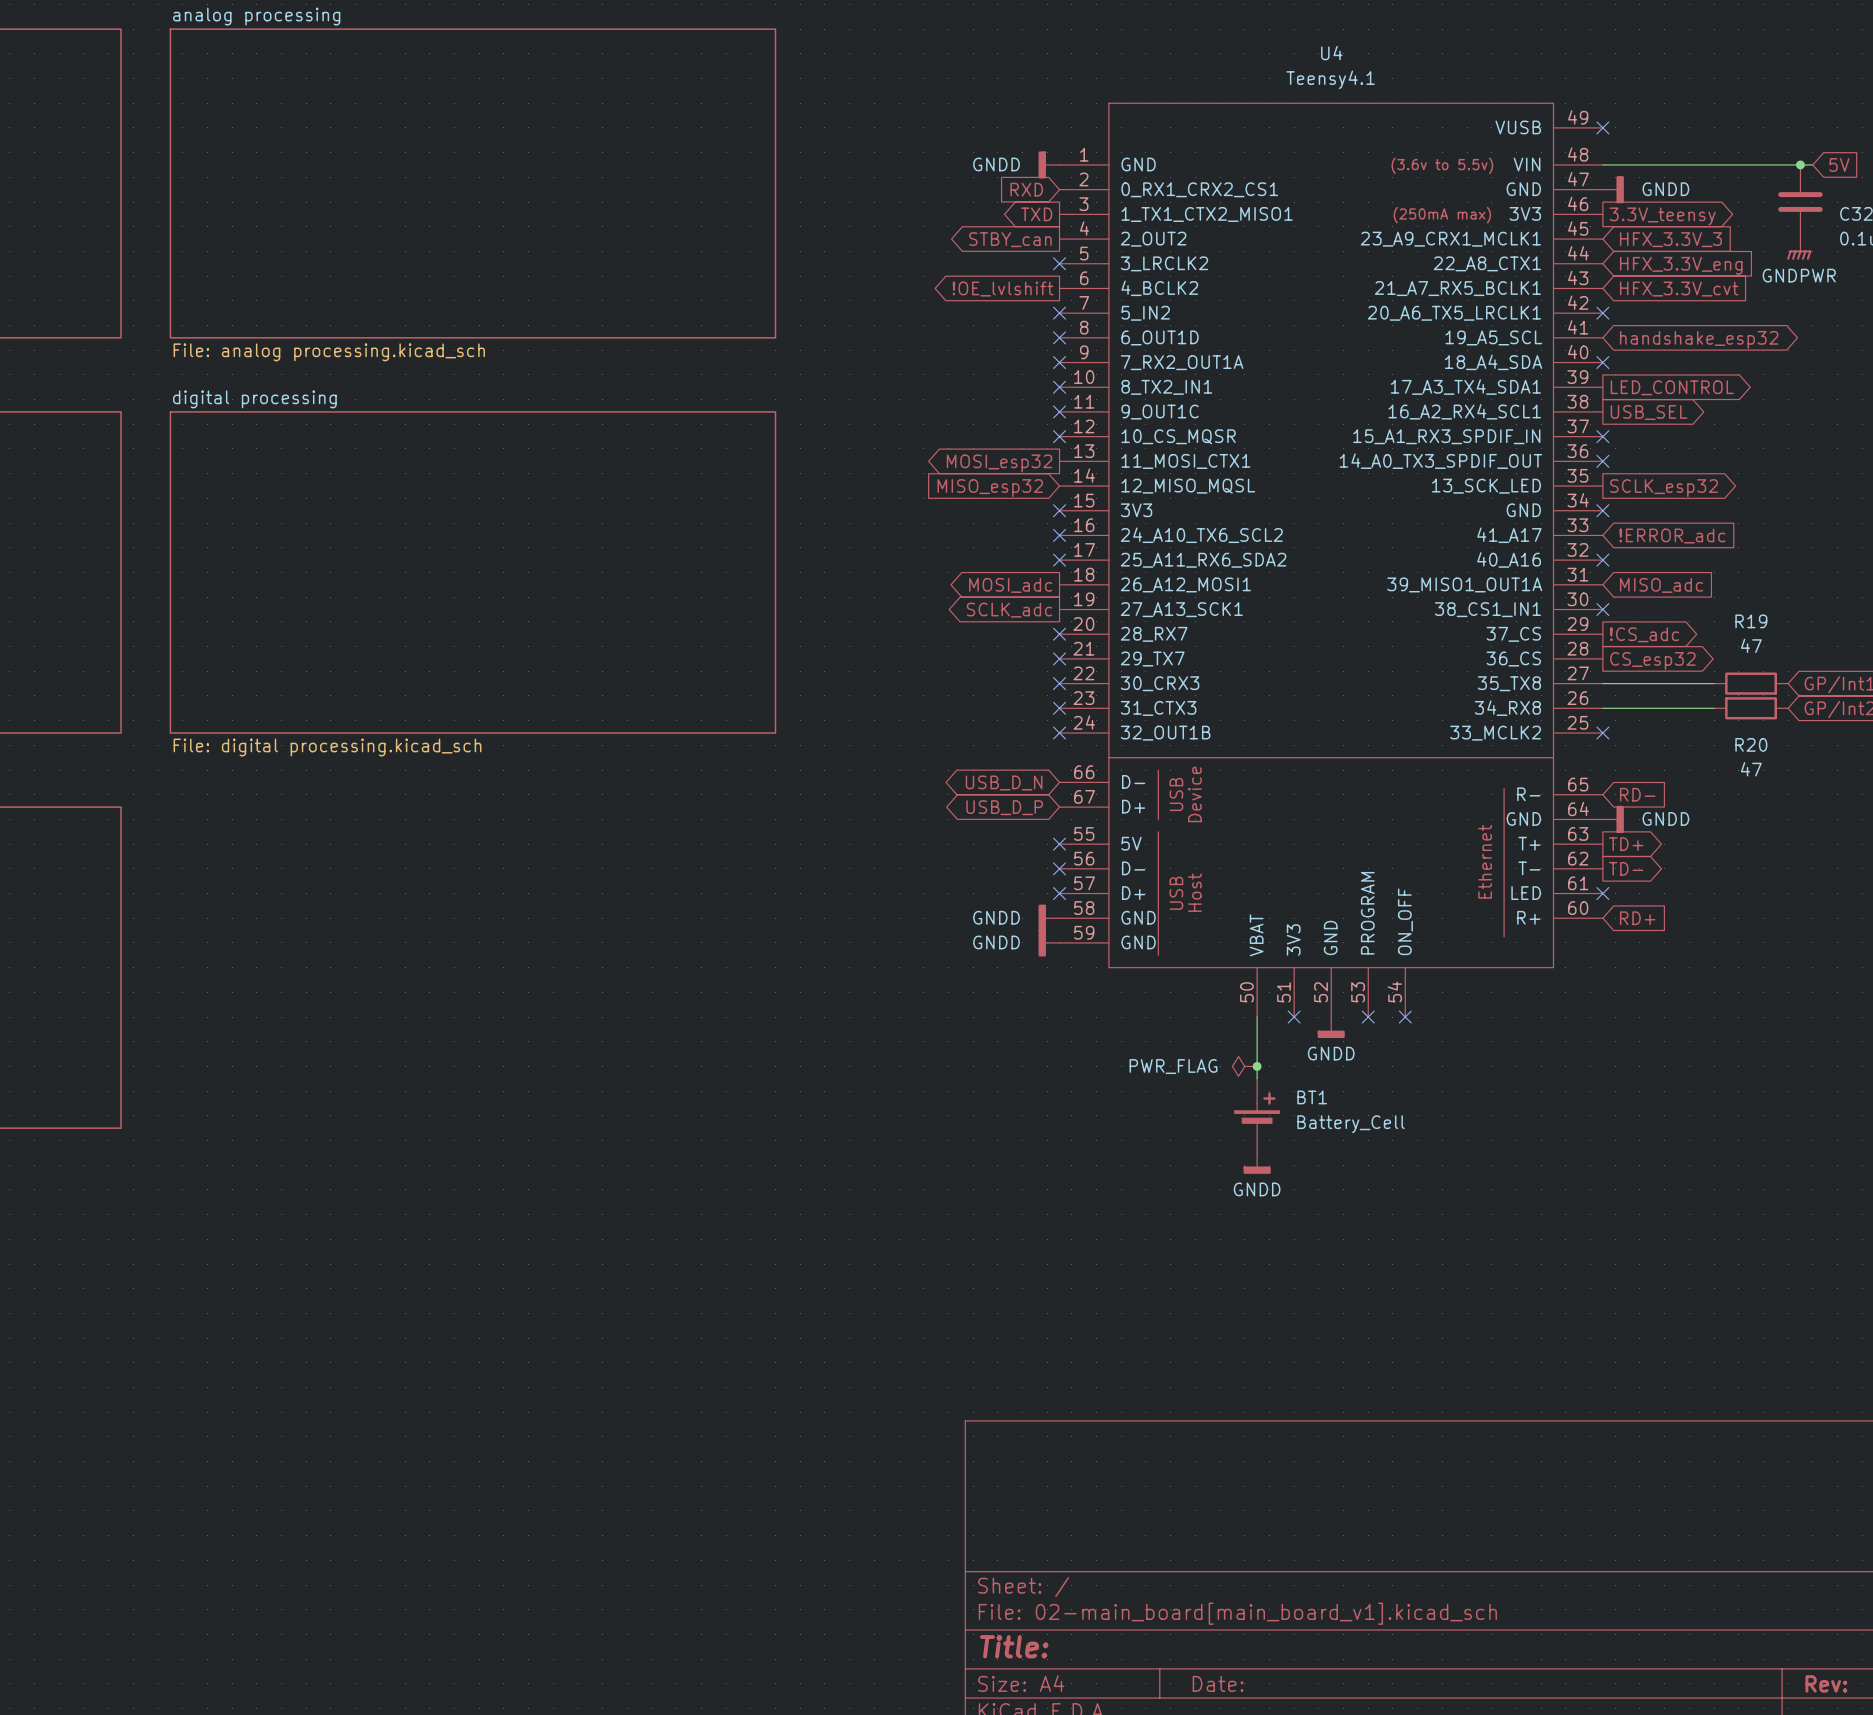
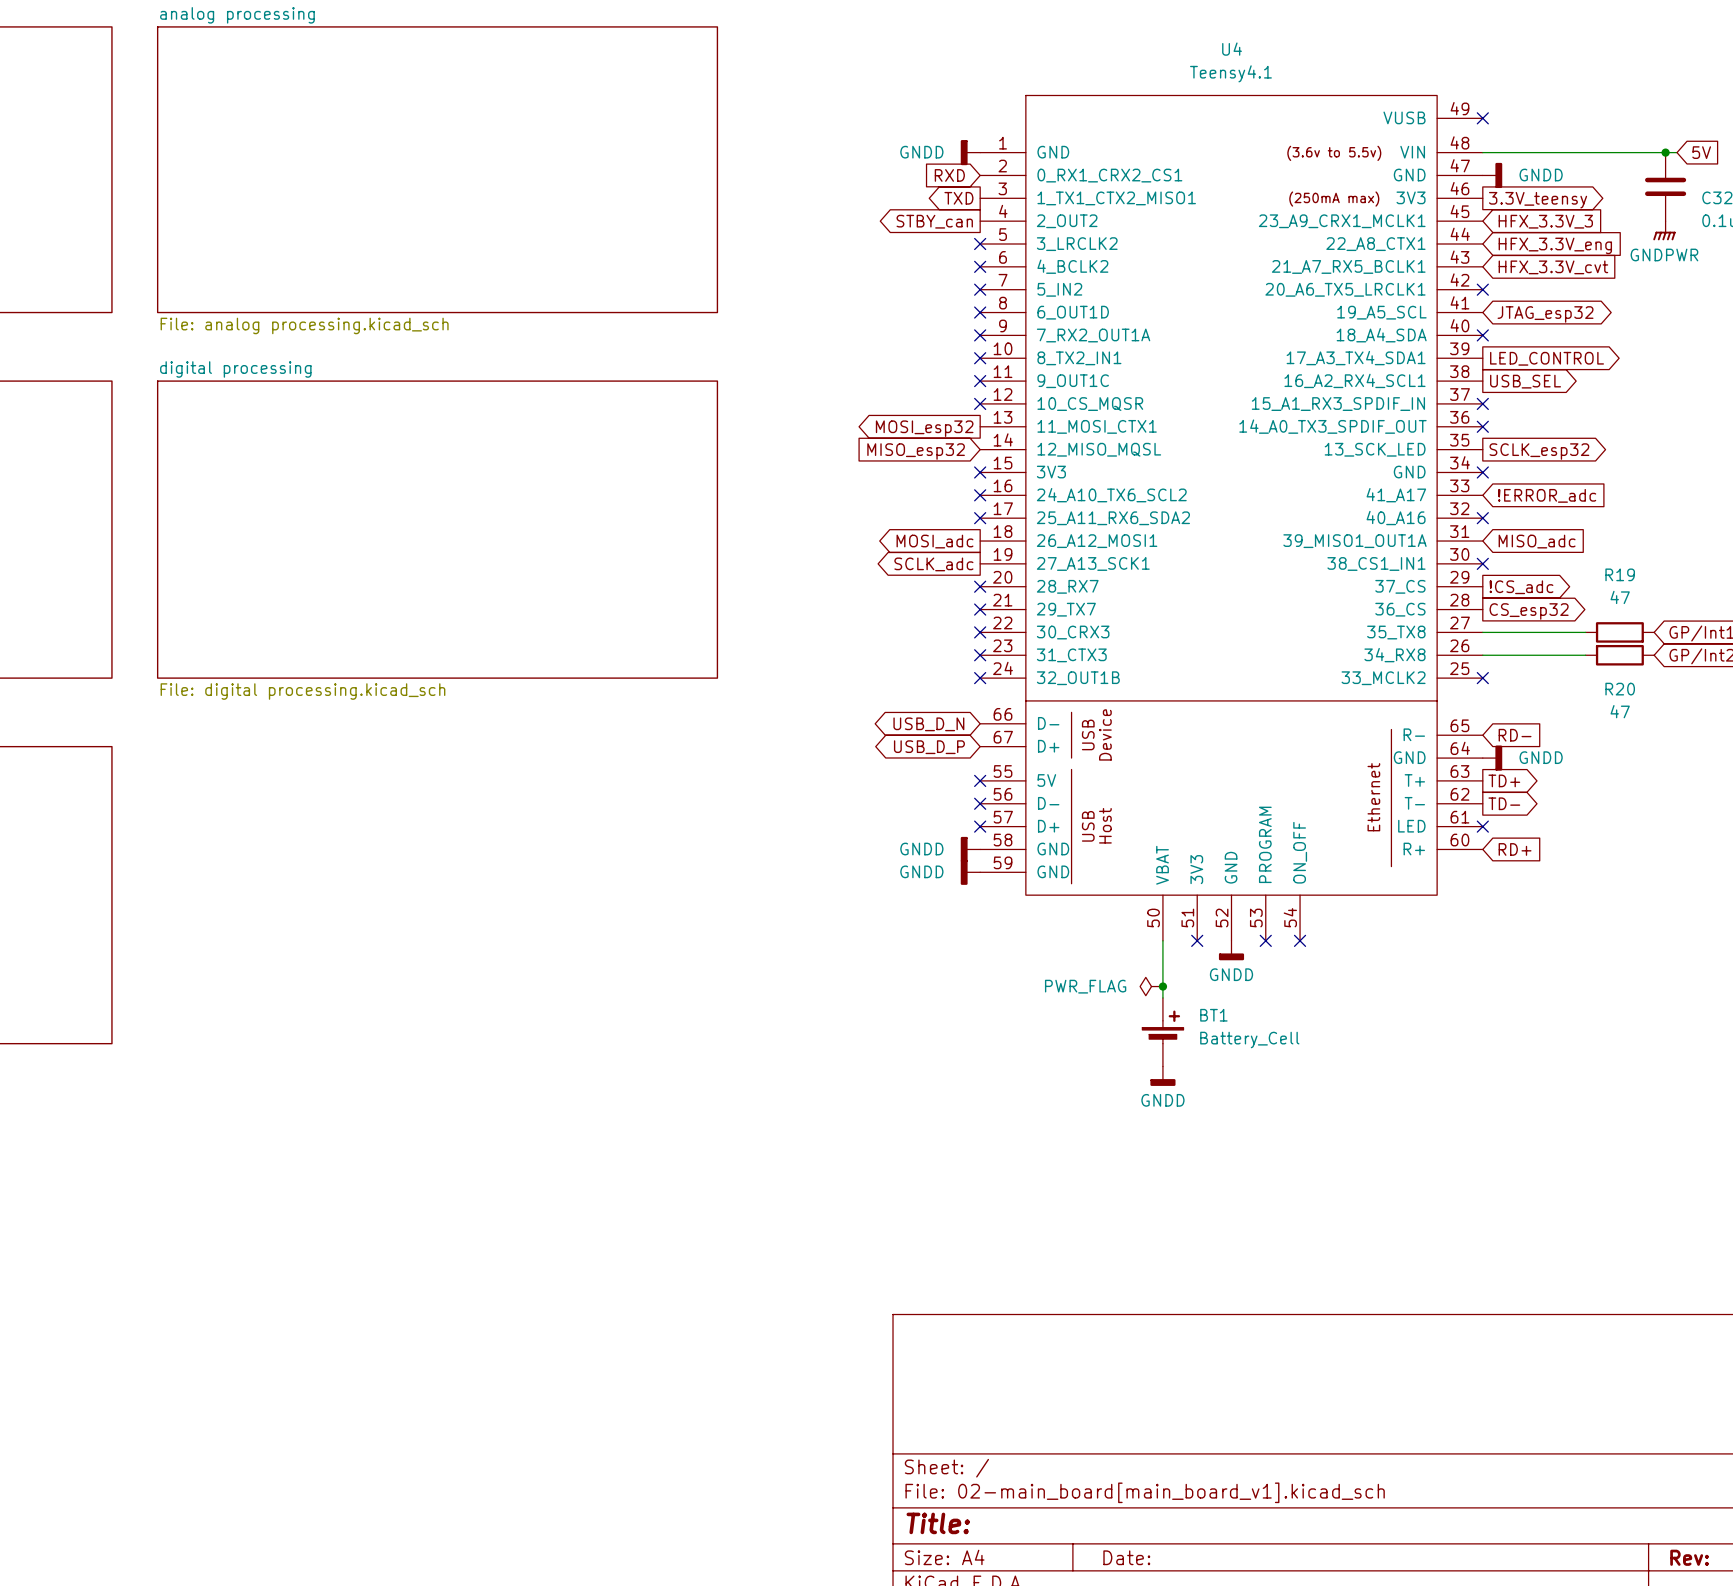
no-connect mark: none -> (980, 266)
global label: !OE_lvlshift (1003, 289) -> none
global label: handshake_esp32 (1699, 339) -> JTAG_esp32 (1545, 314)

